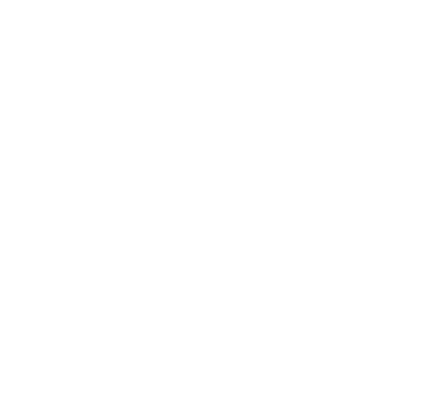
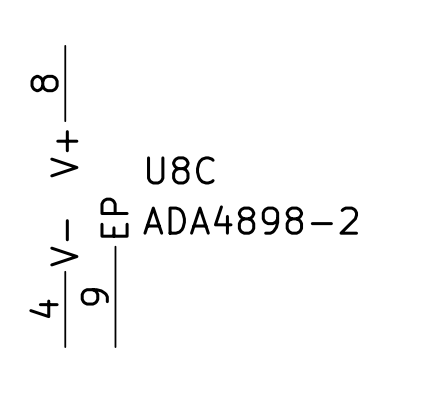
U8C: none -> ADA4898-2 (90, 196)

